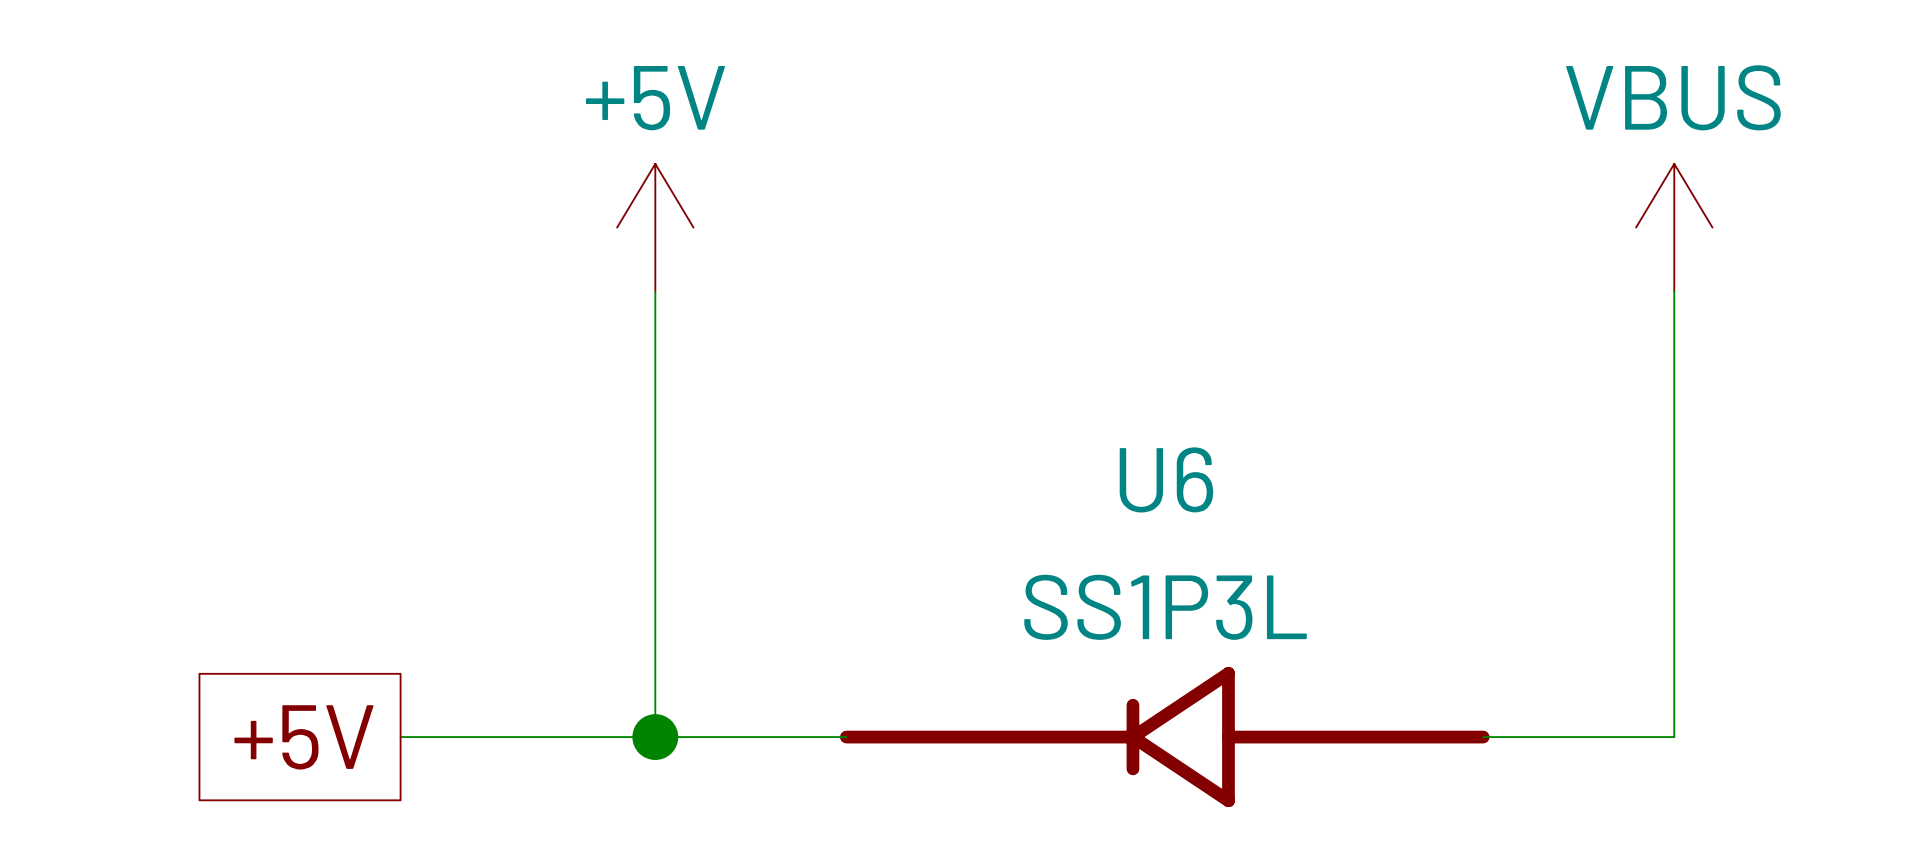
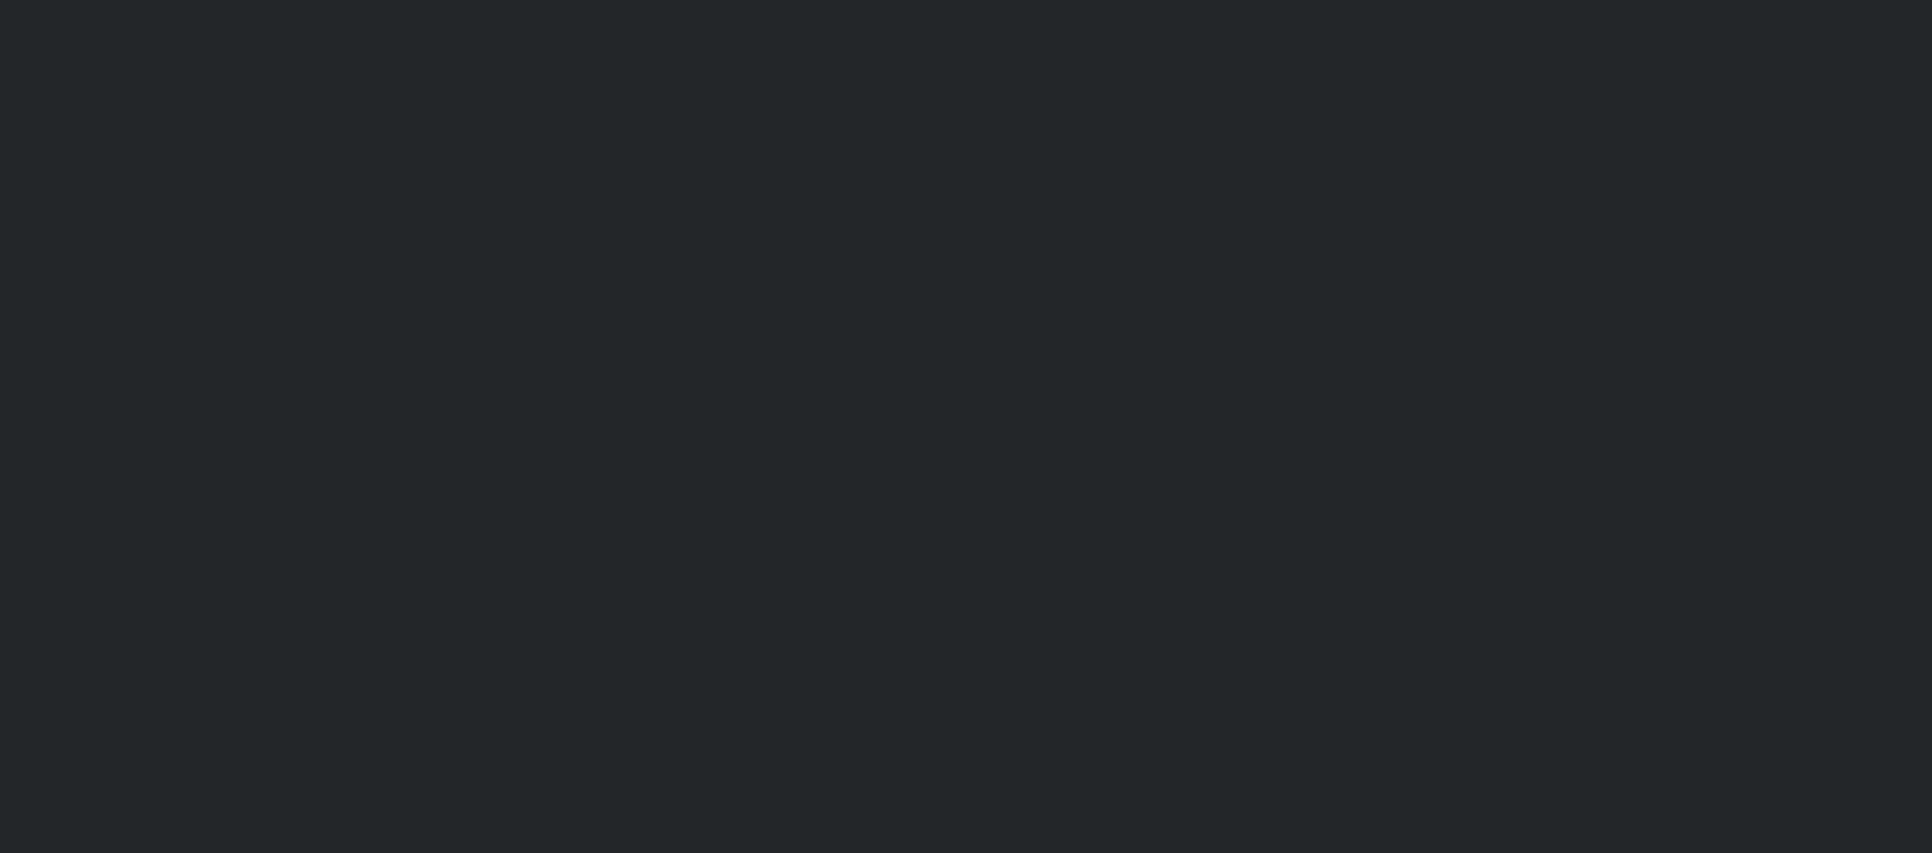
power symbol: +5V (655, 227) -> none
power symbol: VBUS (1674, 227) -> none
wire: (655, 291) (655, 737) -> none
wire: (1674, 291) (1674, 737) (1483, 737) -> none
global label: +5V (304, 737) -> none
wire: (400, 737) (846, 737) -> none
junction: (655, 737) -> none
U6: SS1P3L (1164, 737) -> none

